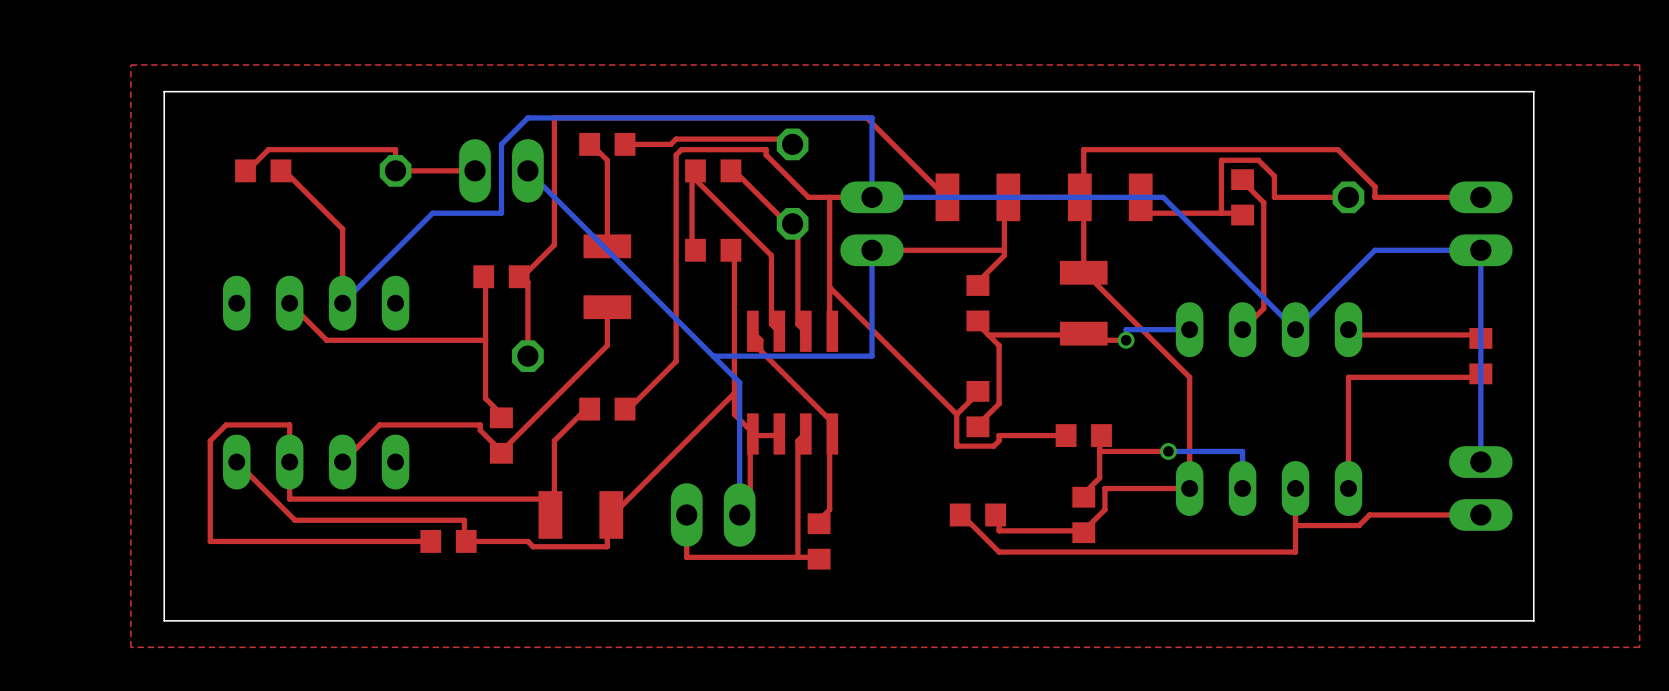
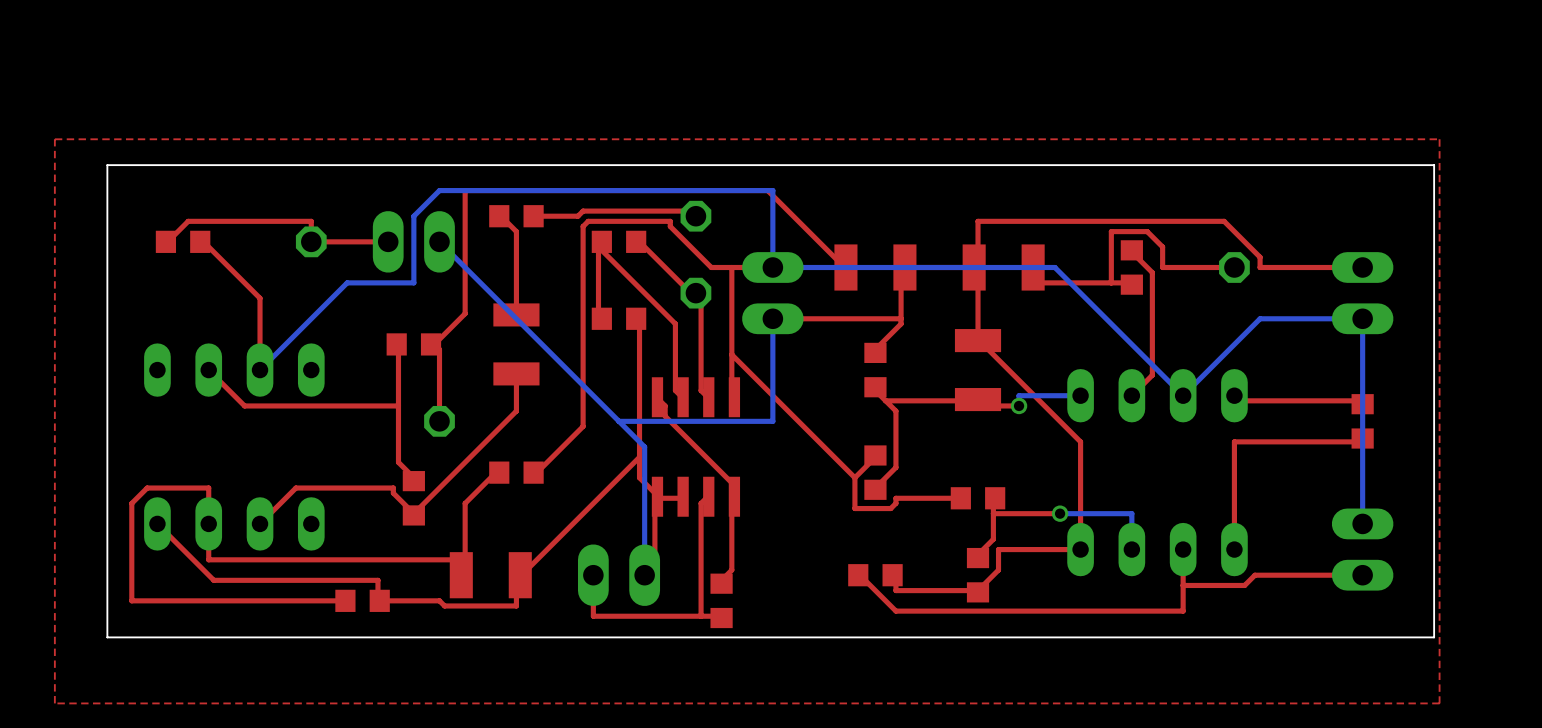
top zone outline: (1560, 64) (1639, 64) (1639, 647) (1560, 647) -> (1439, 139) (1439, 703)
board edge: (1533, 91) (1533, 620) (164, 620) (164, 91) (185, 91) -> (1413, 165) (1434, 165) (1434, 637) (107, 637) (107, 165)

